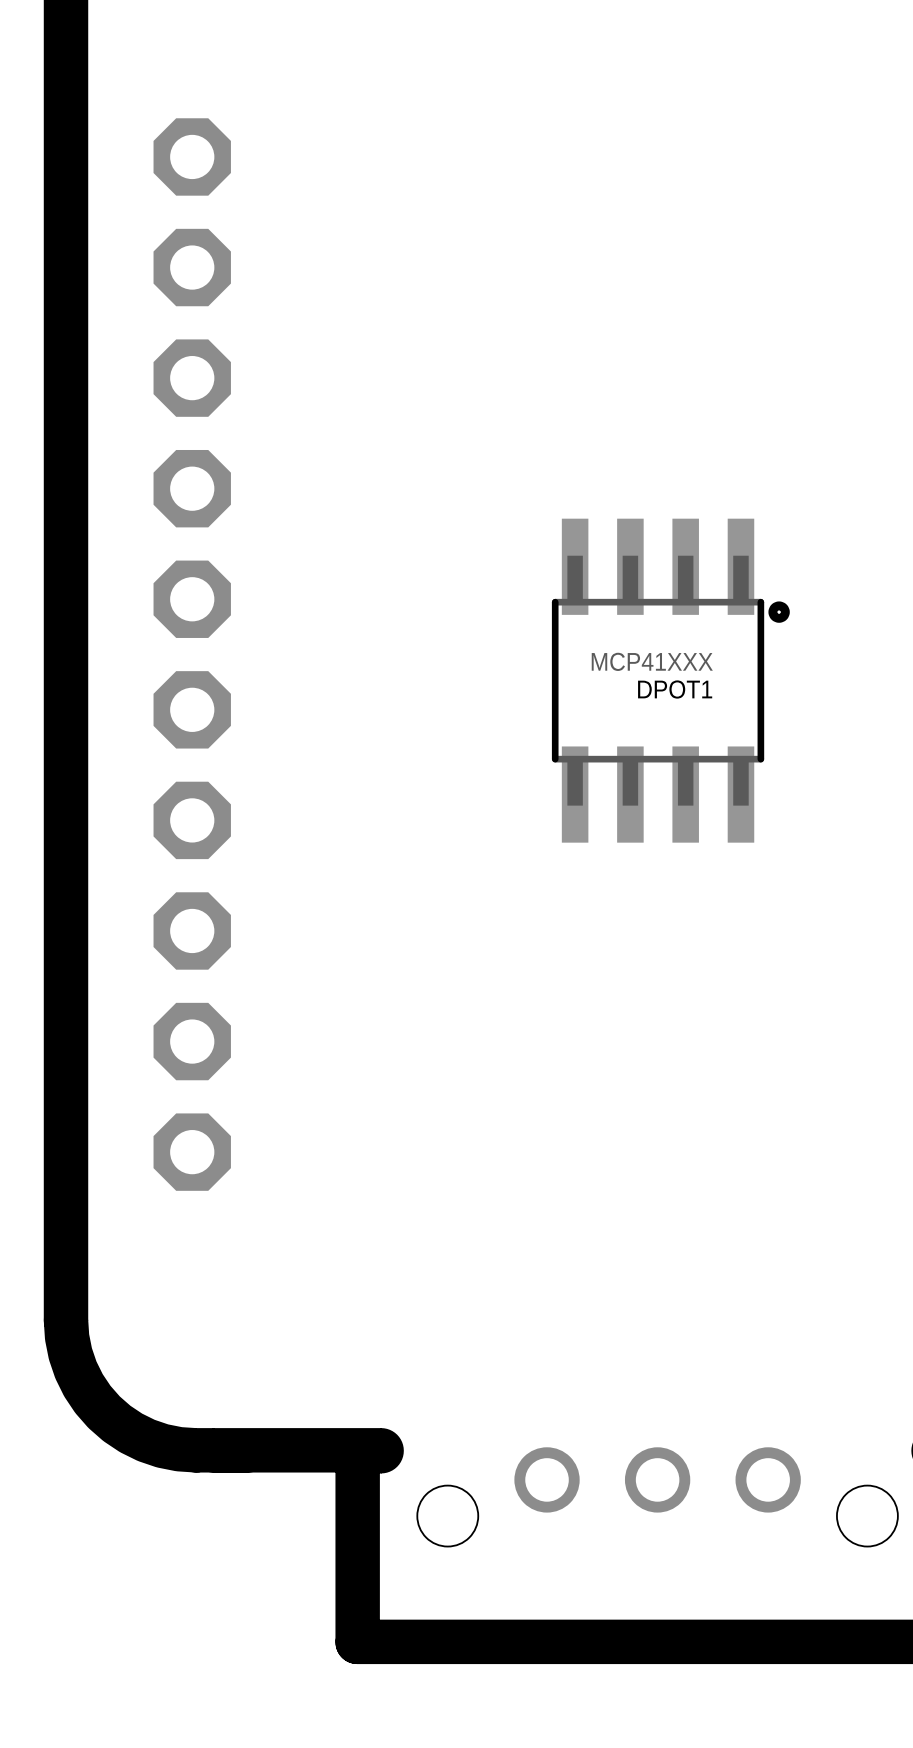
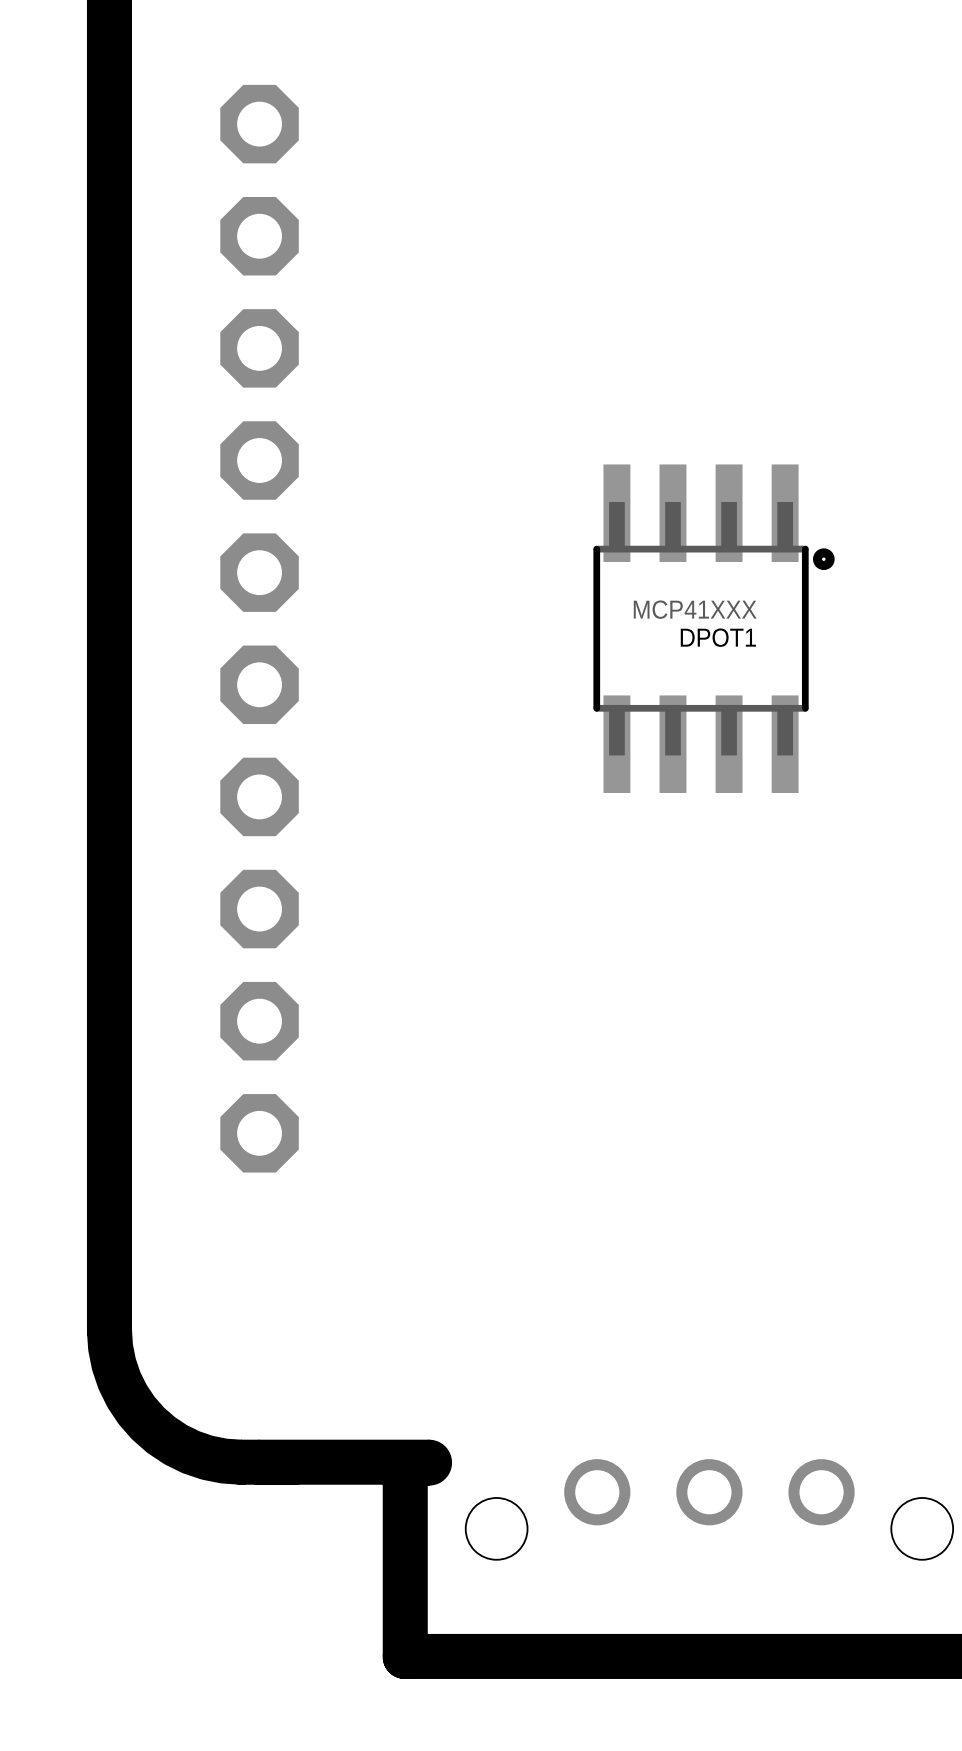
part position: (192, 654) -> (259, 628)
DPOT1 position: (670, 680) -> (714, 628)

